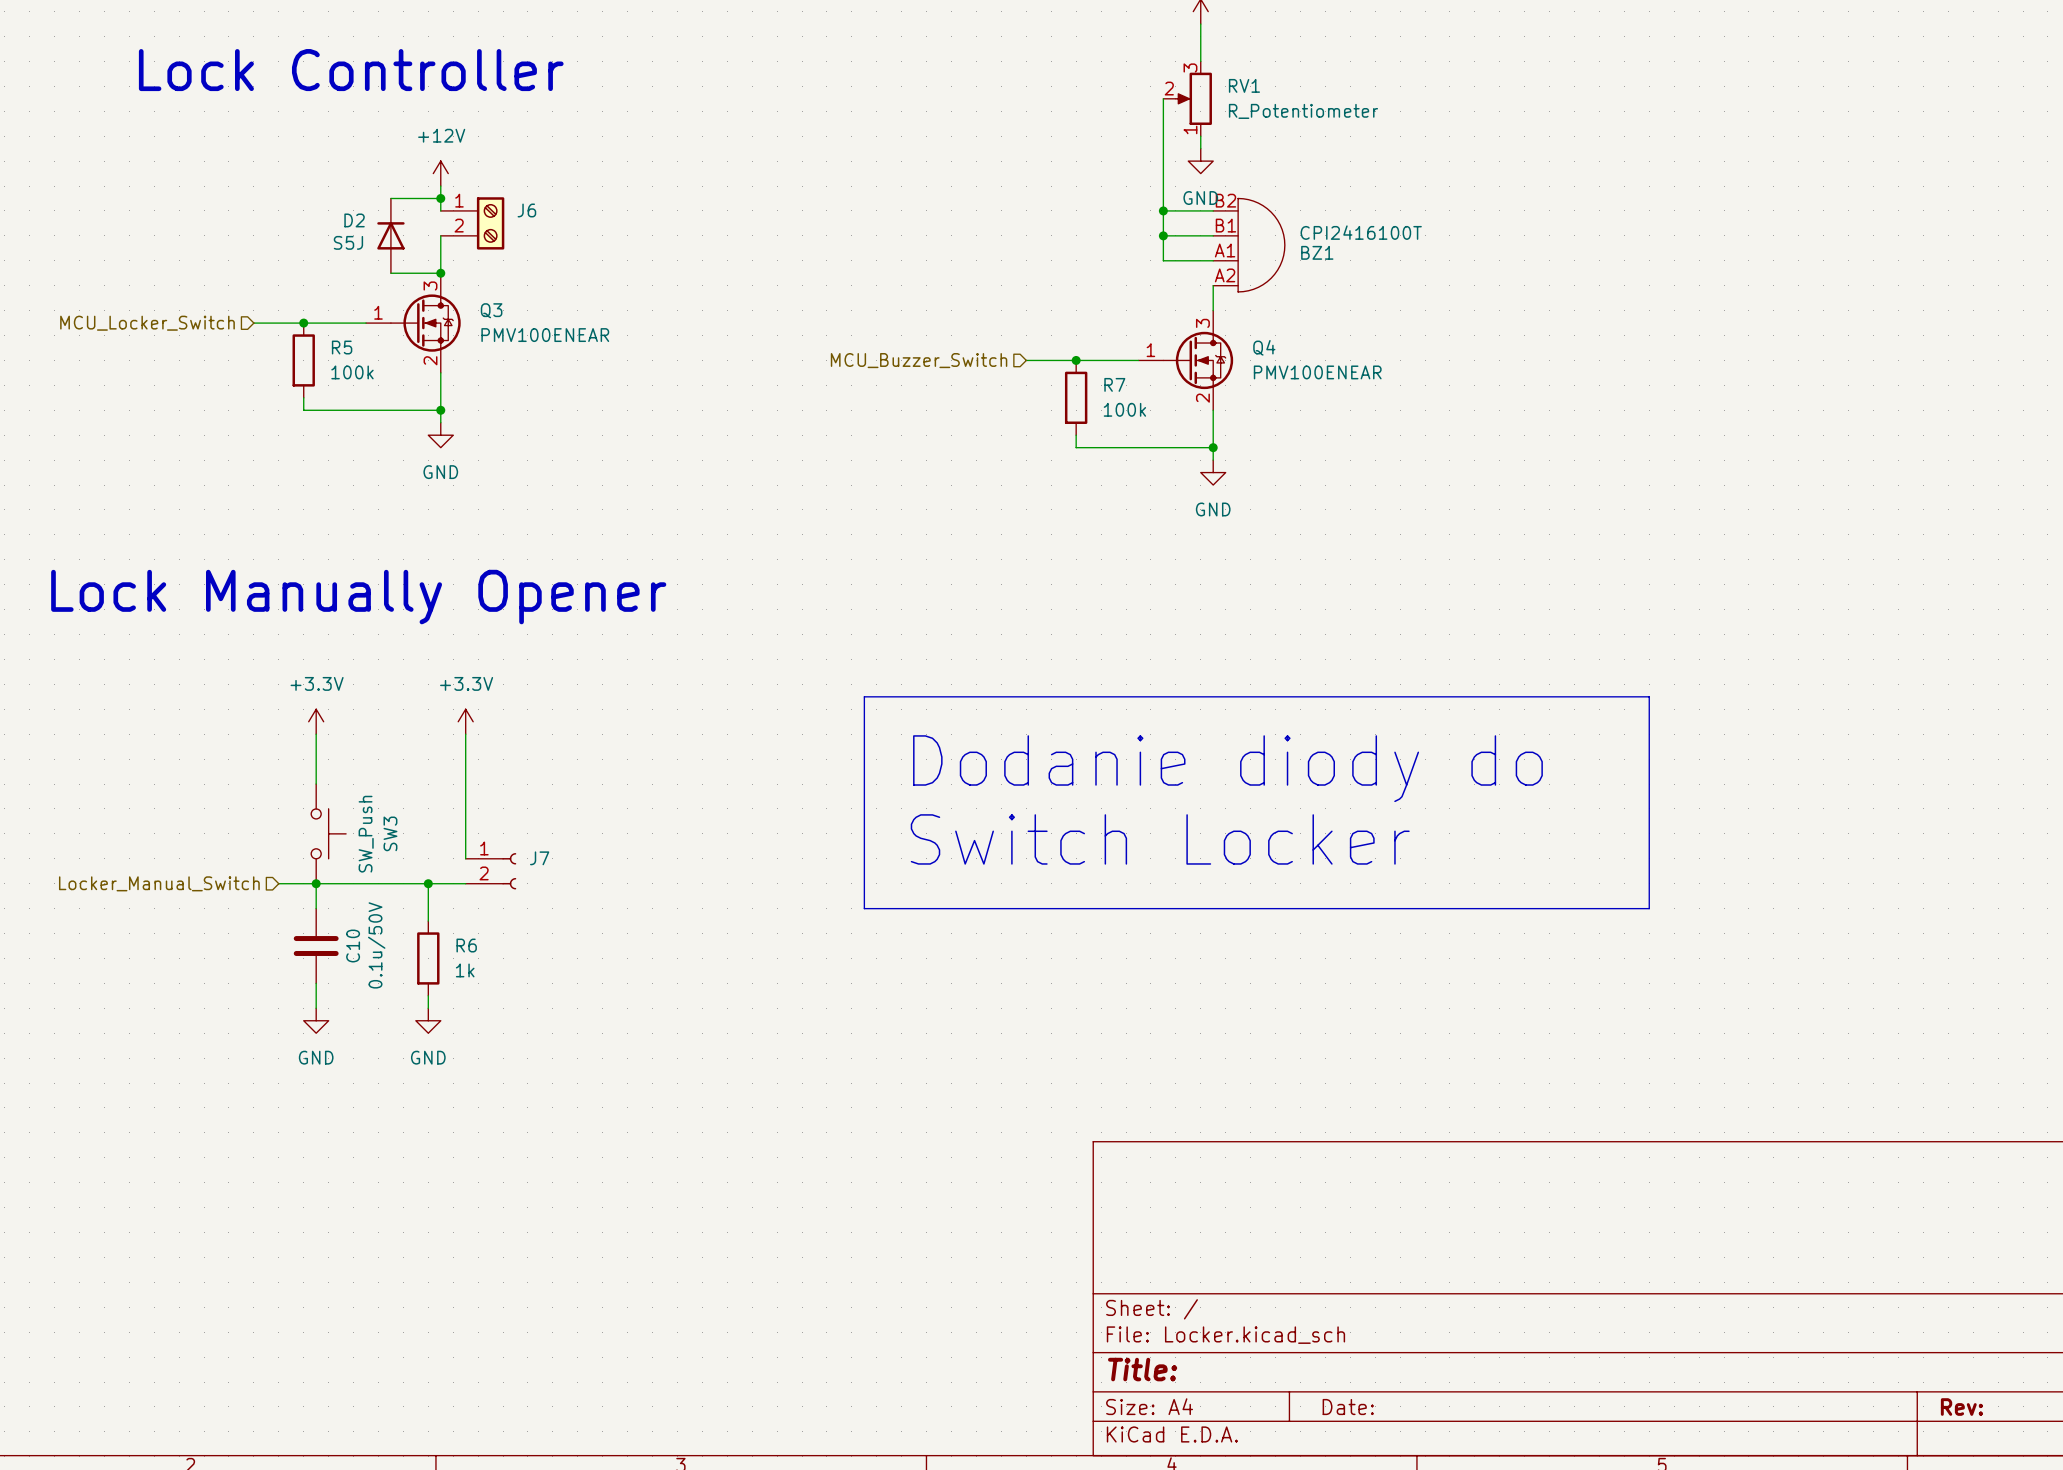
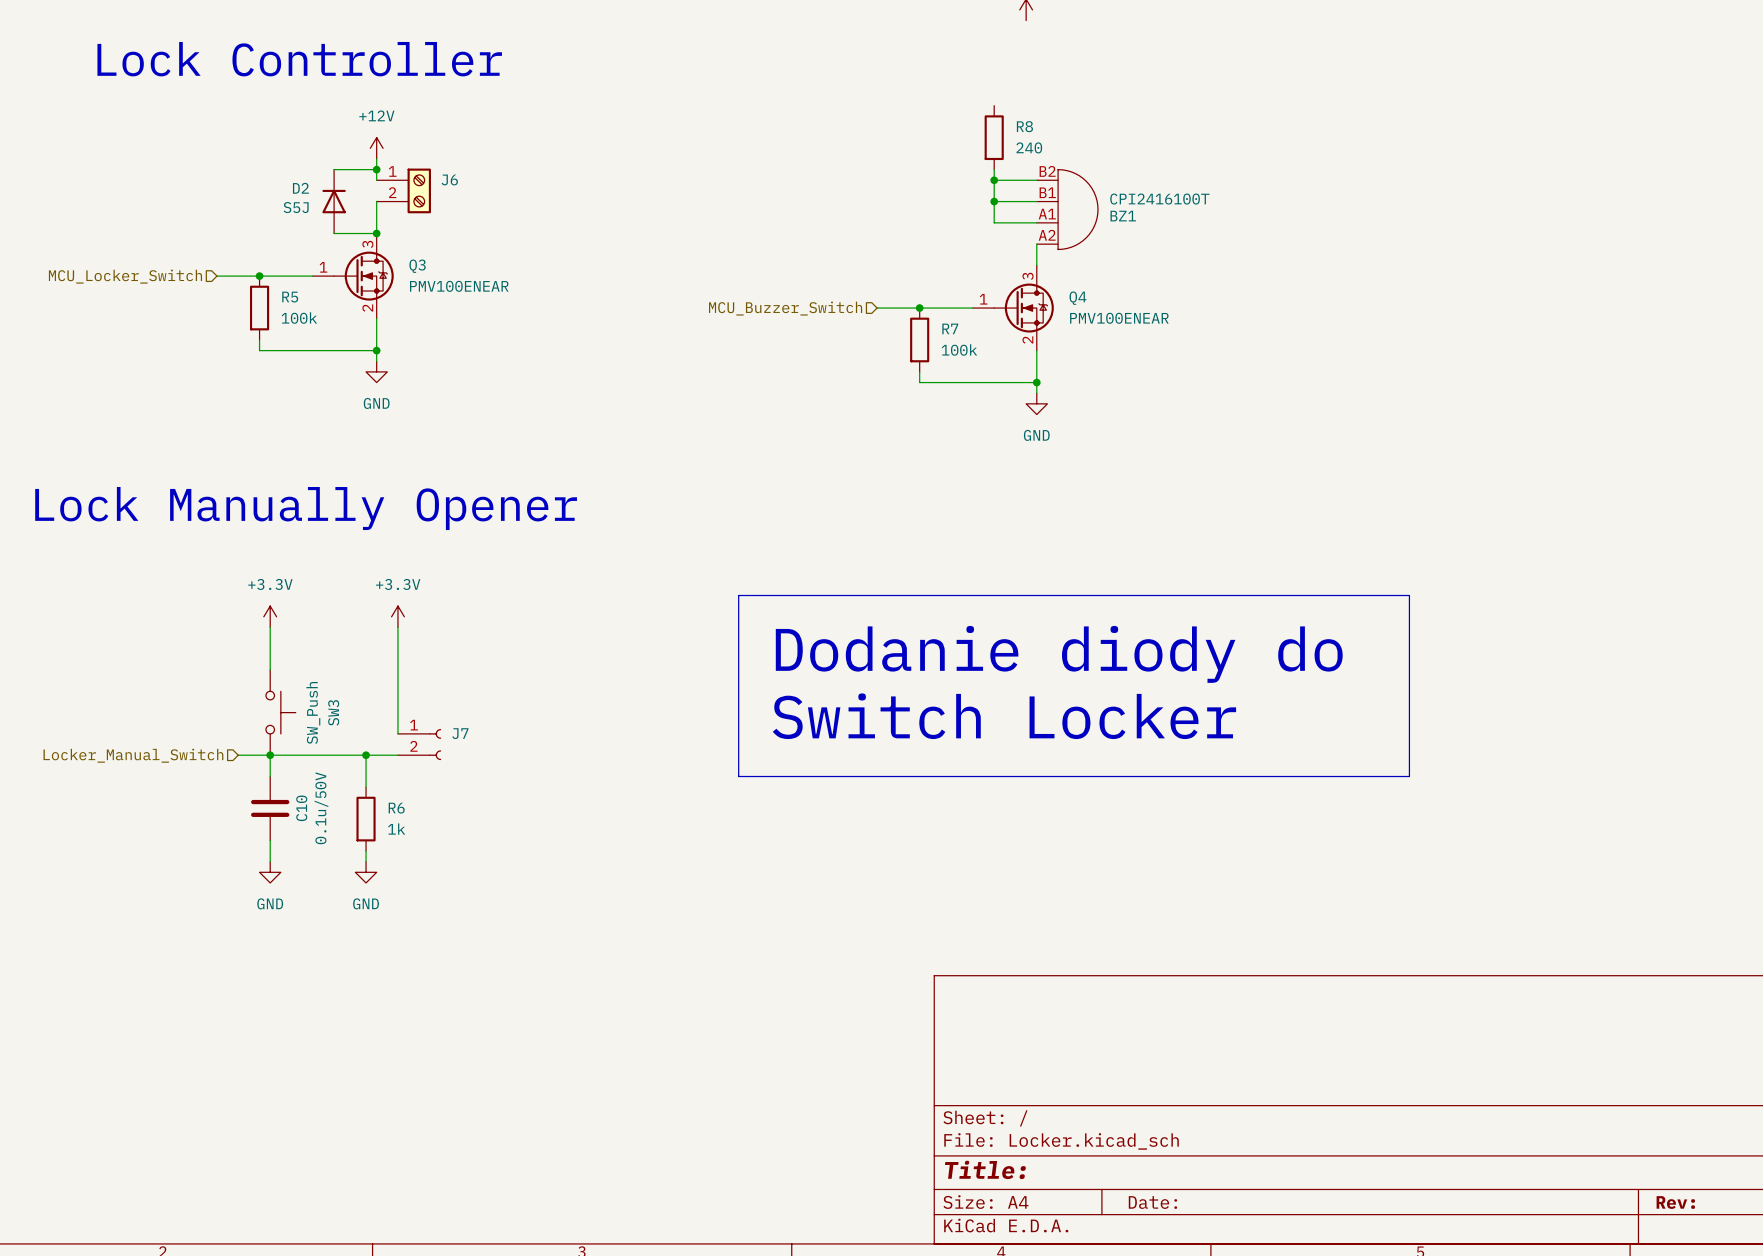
wire: (1200, 24) (1200, 61) -> none
wire: (1163, 98) (1163, 198) -> none
RV1: R_Potentiometer (1187, 98) -> none
wire: (1200, 136) (1200, 148) -> none
R8: none -> 240 (994, 137)
power symbol: GND (1200, 161) -> none

